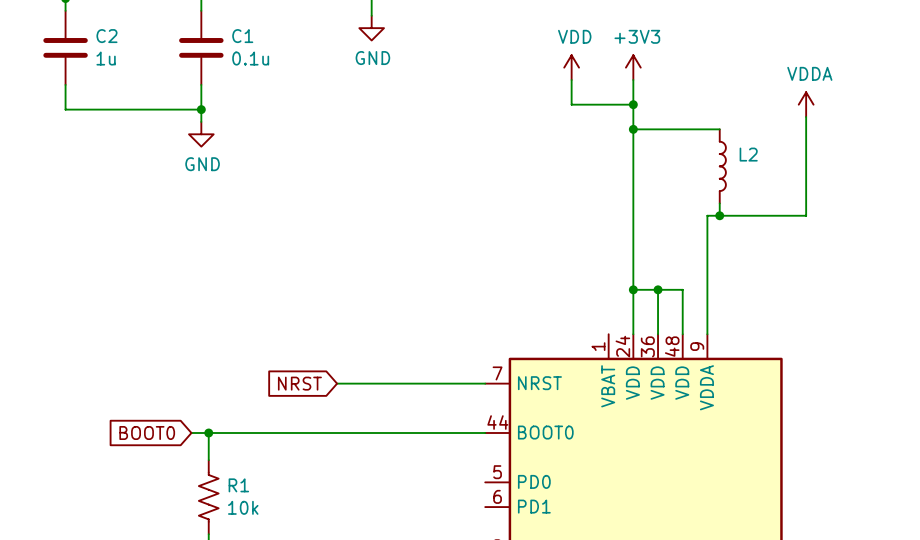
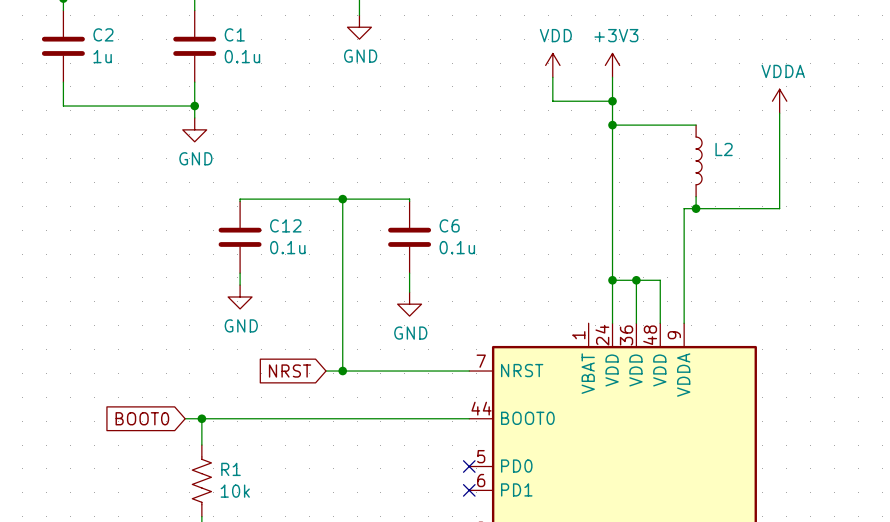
wire: none -> (342, 199) (342, 371)
junction: none -> (342, 199)
wire: none -> (240, 201) (240, 199) (409, 199) (409, 201)
C12: none -> 0.1u (240, 237)
C6: none -> 0.1u (409, 237)
wire: none -> (240, 273) (240, 285)
wire: none -> (409, 273) (409, 292)
power symbol: none -> GND (240, 297)
power symbol: none -> GND (409, 304)
junction: none -> (342, 371)
no-connect mark: none -> (469, 466)
no-connect mark: none -> (469, 490)

